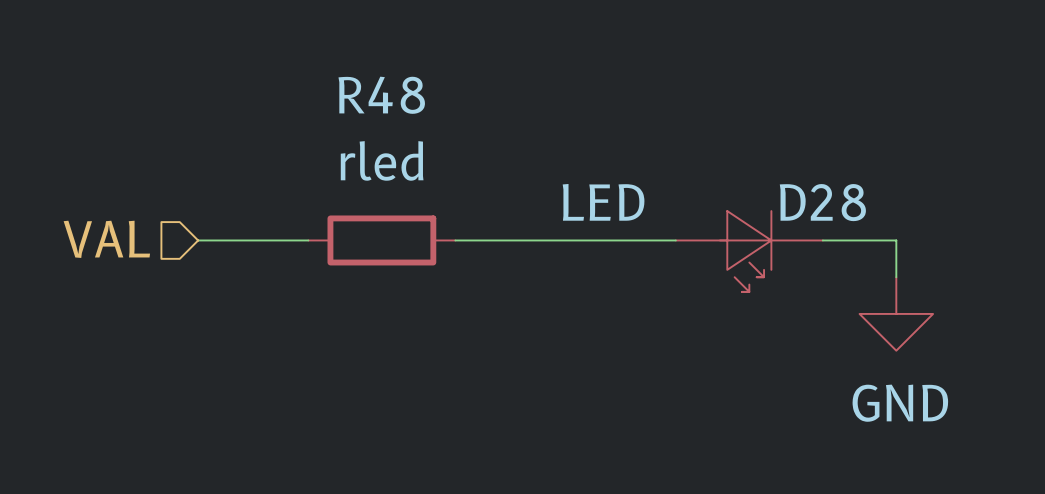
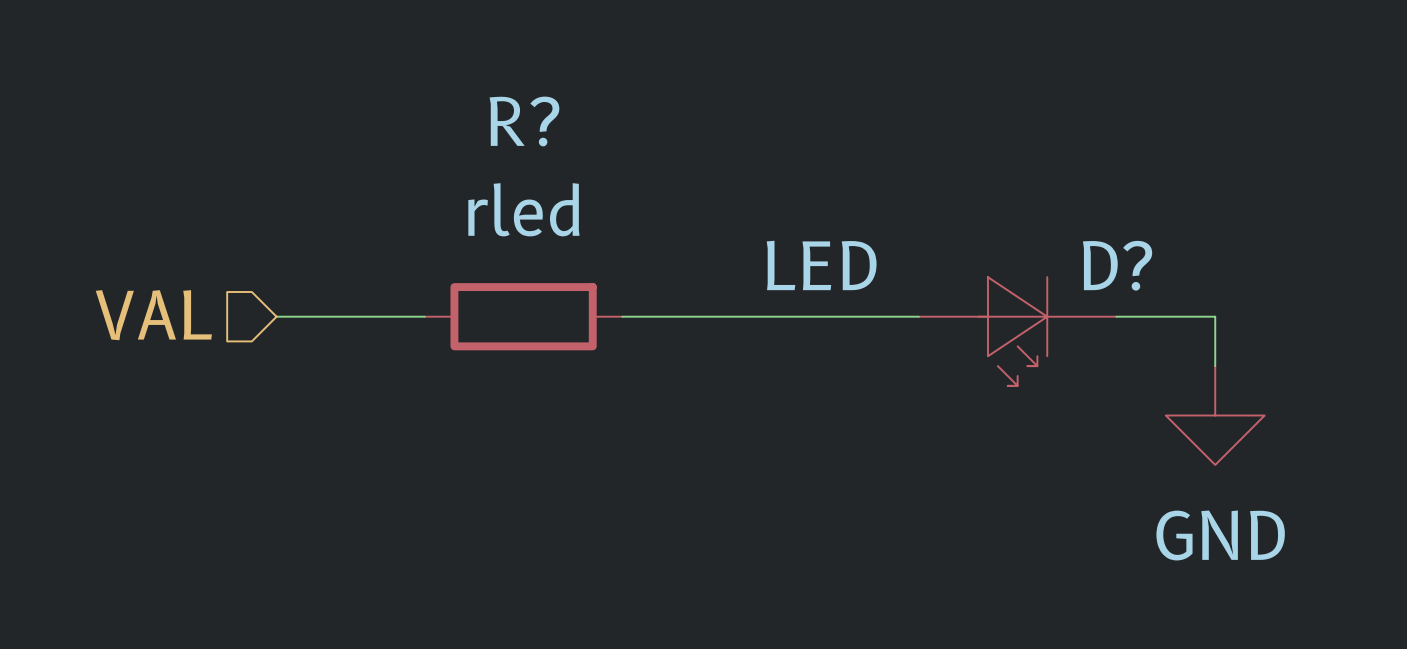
R48 name: R48 (381, 95) -> R? (524, 121)
D28 name: D28 (822, 202) -> D? (1117, 265)

